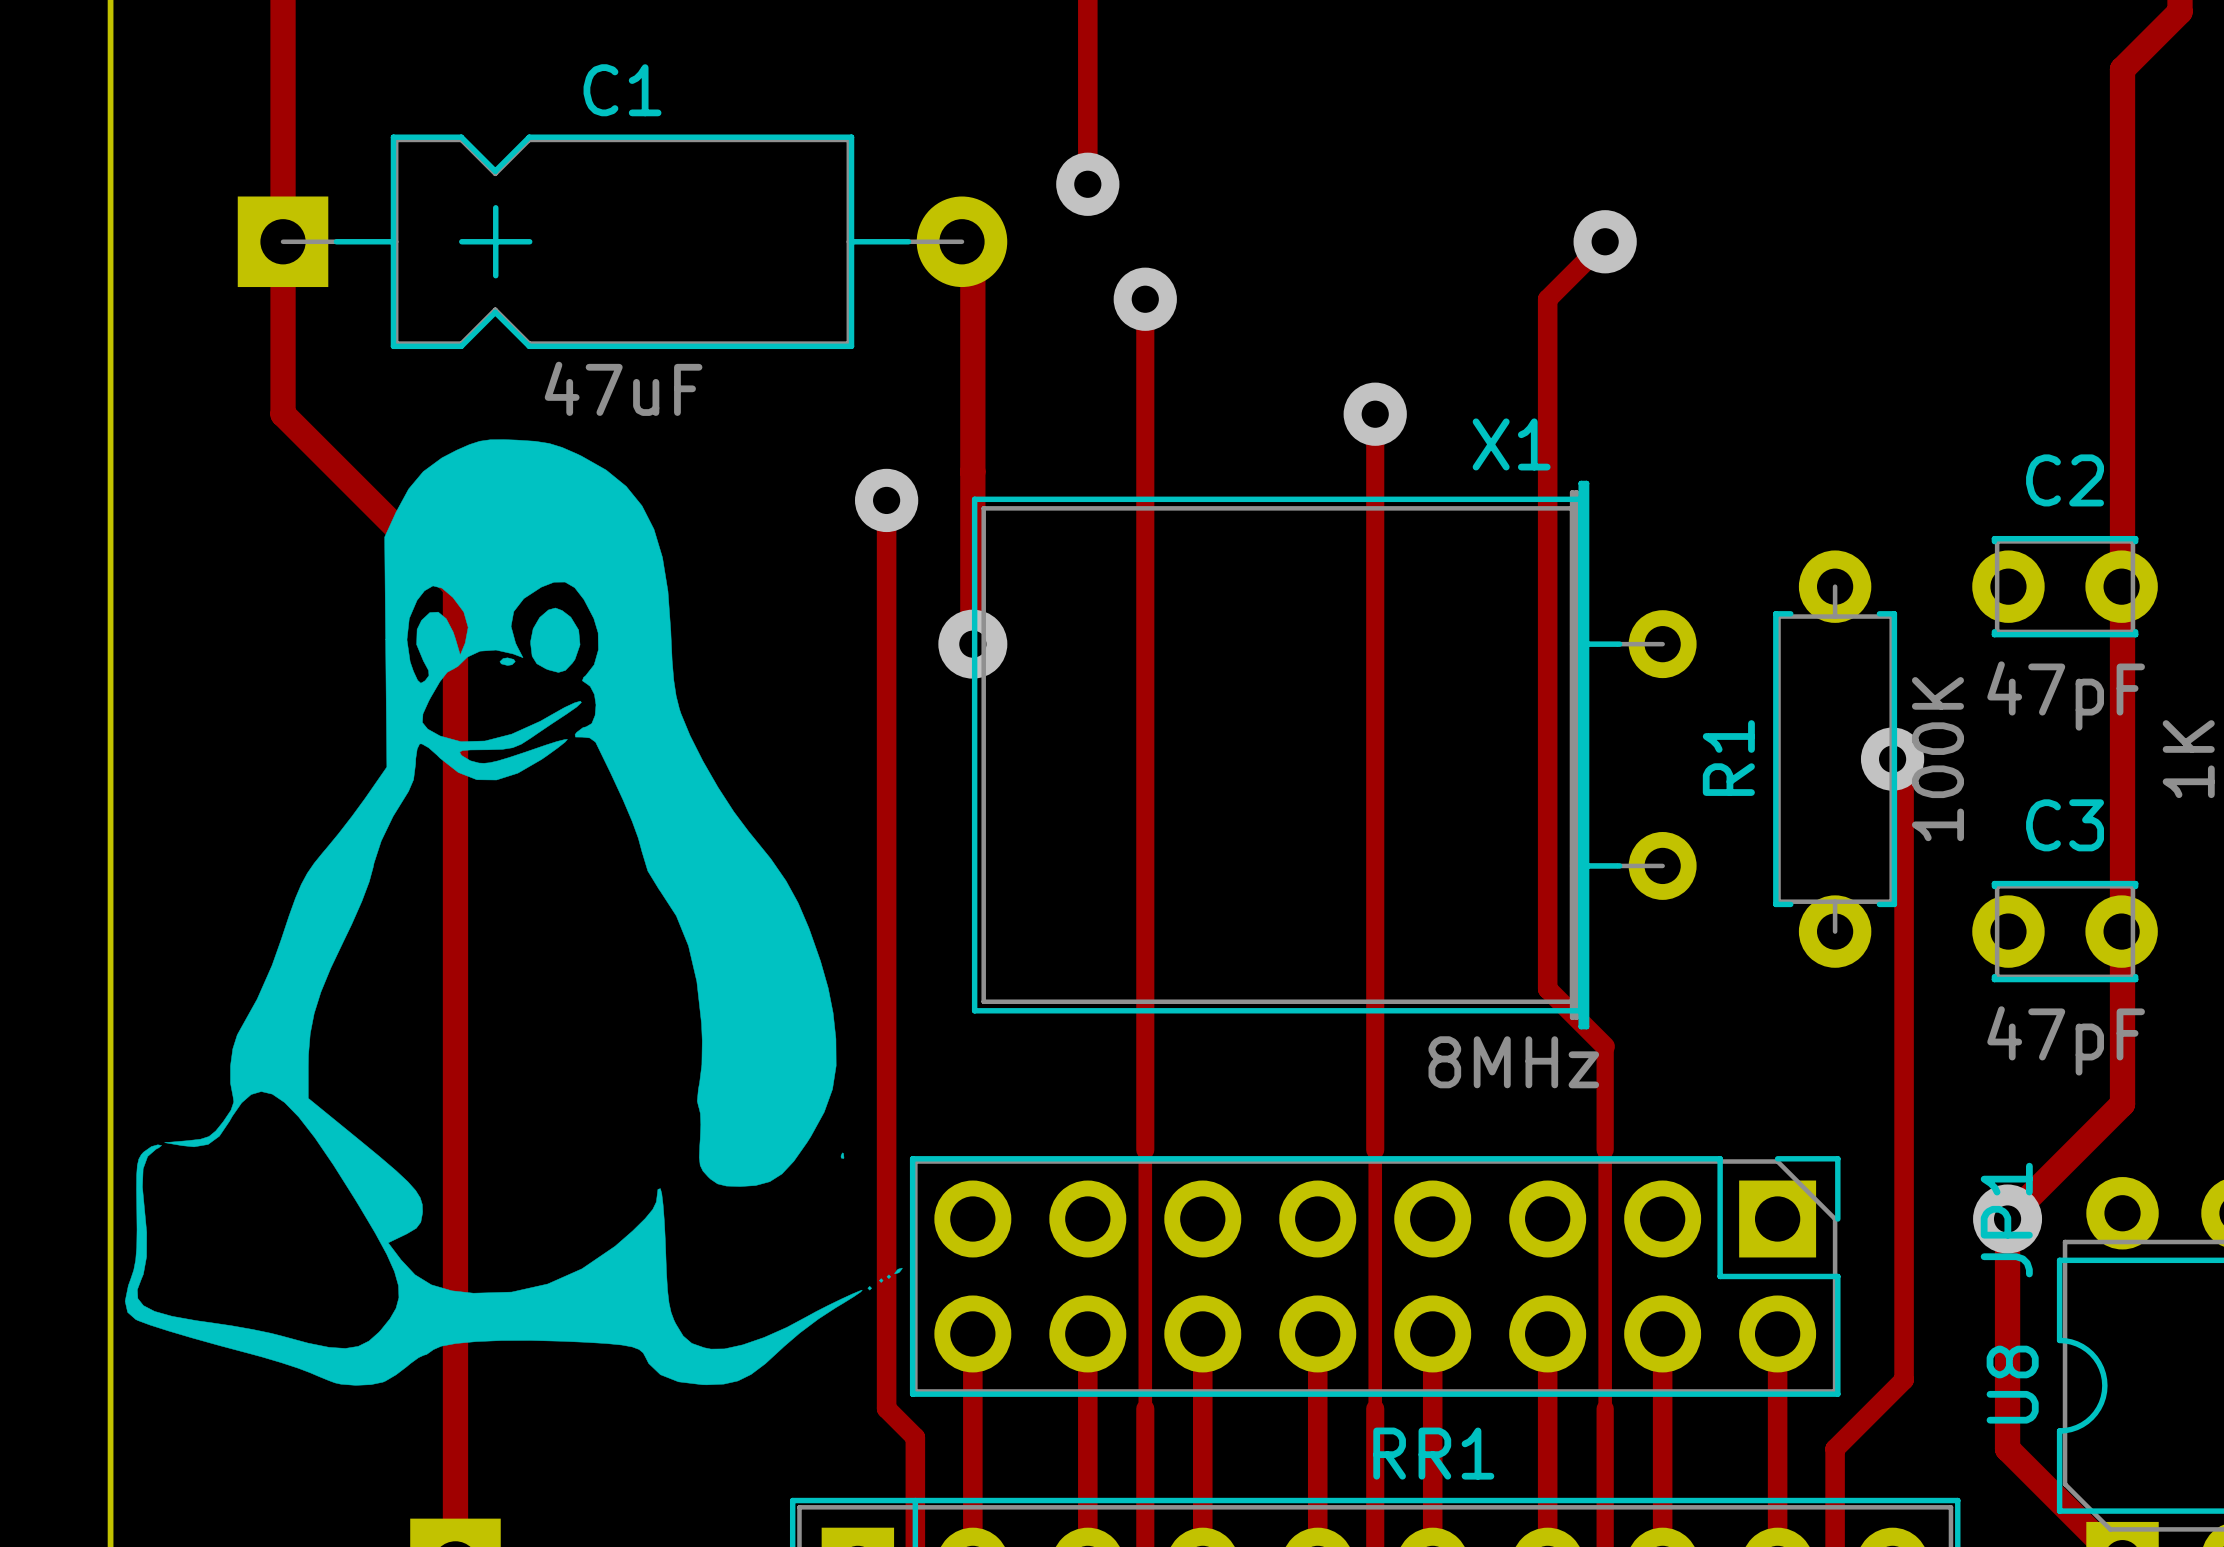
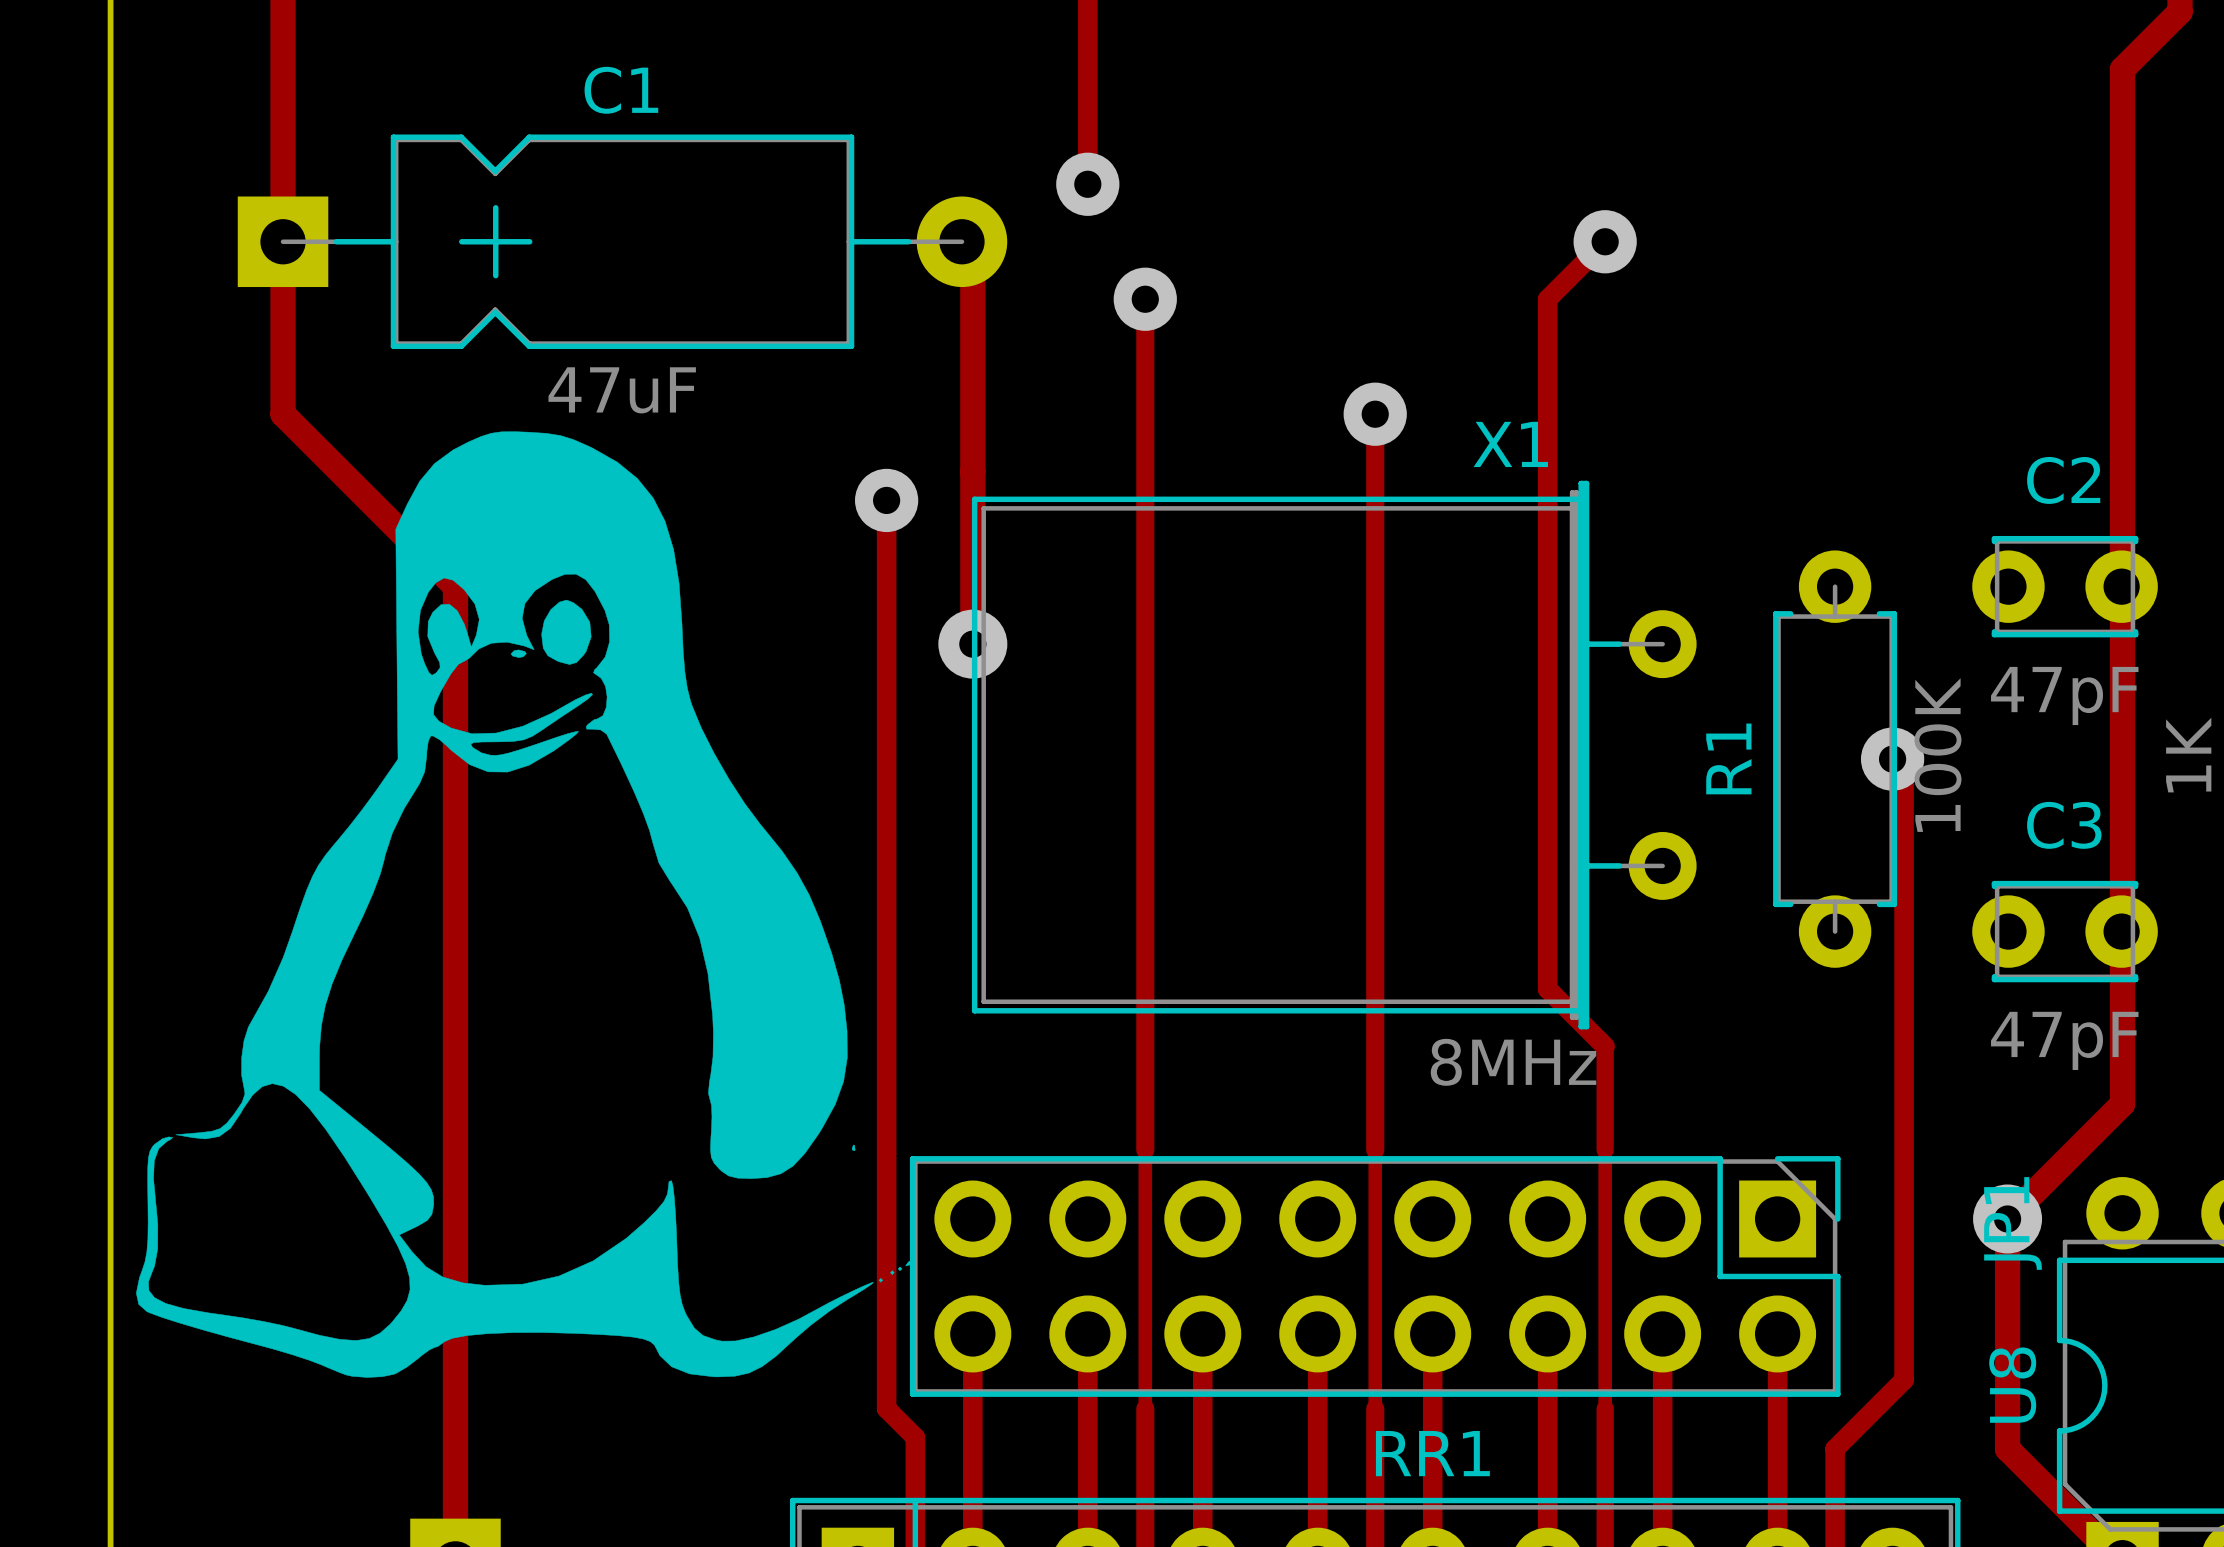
drawing position: (513, 912) -> (524, 904)

